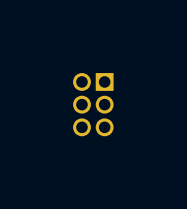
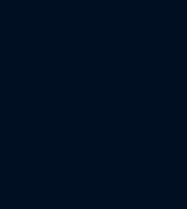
part: (93, 104) -> none

